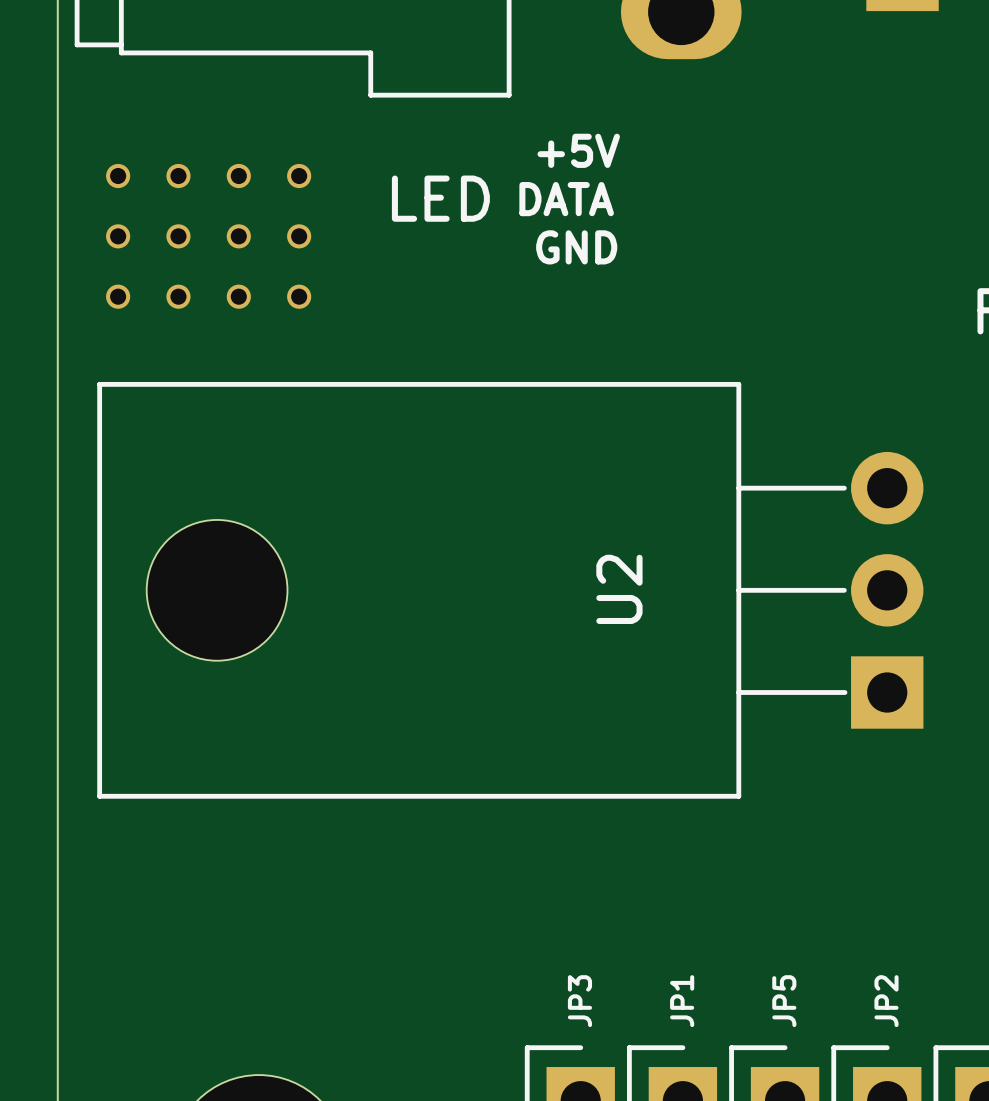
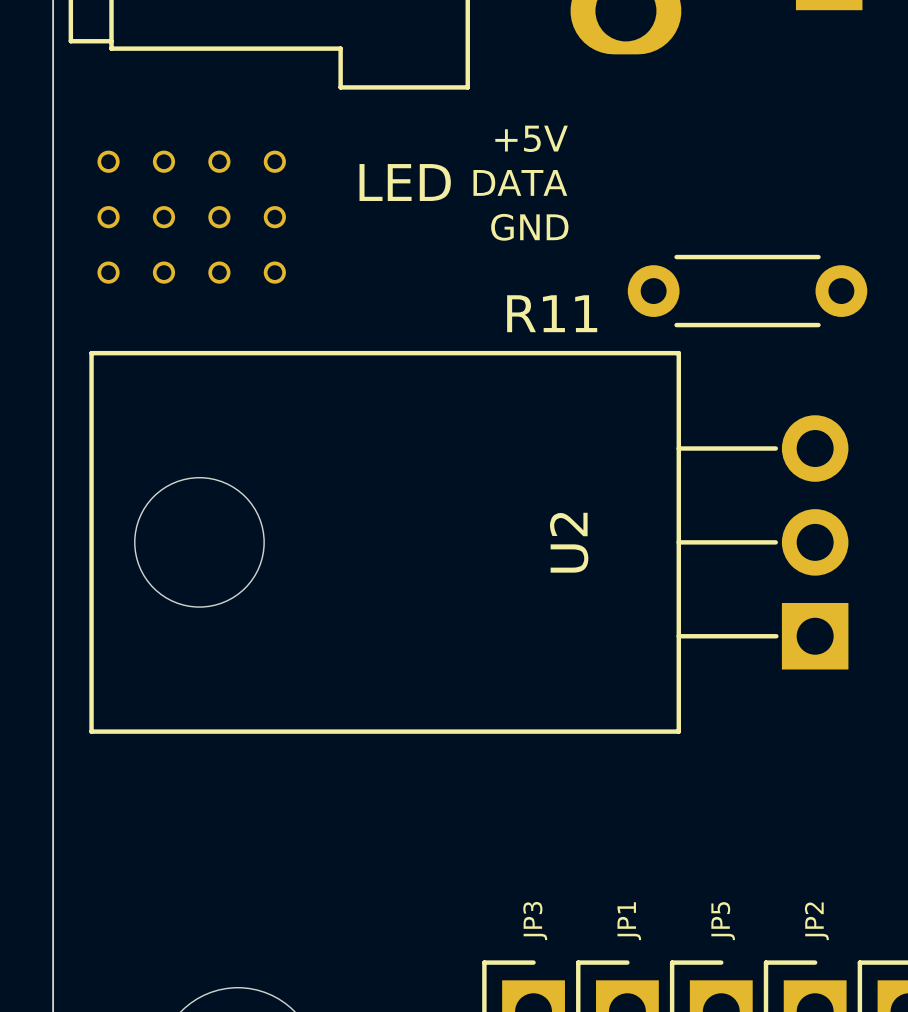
R11: none -> (747, 291)

